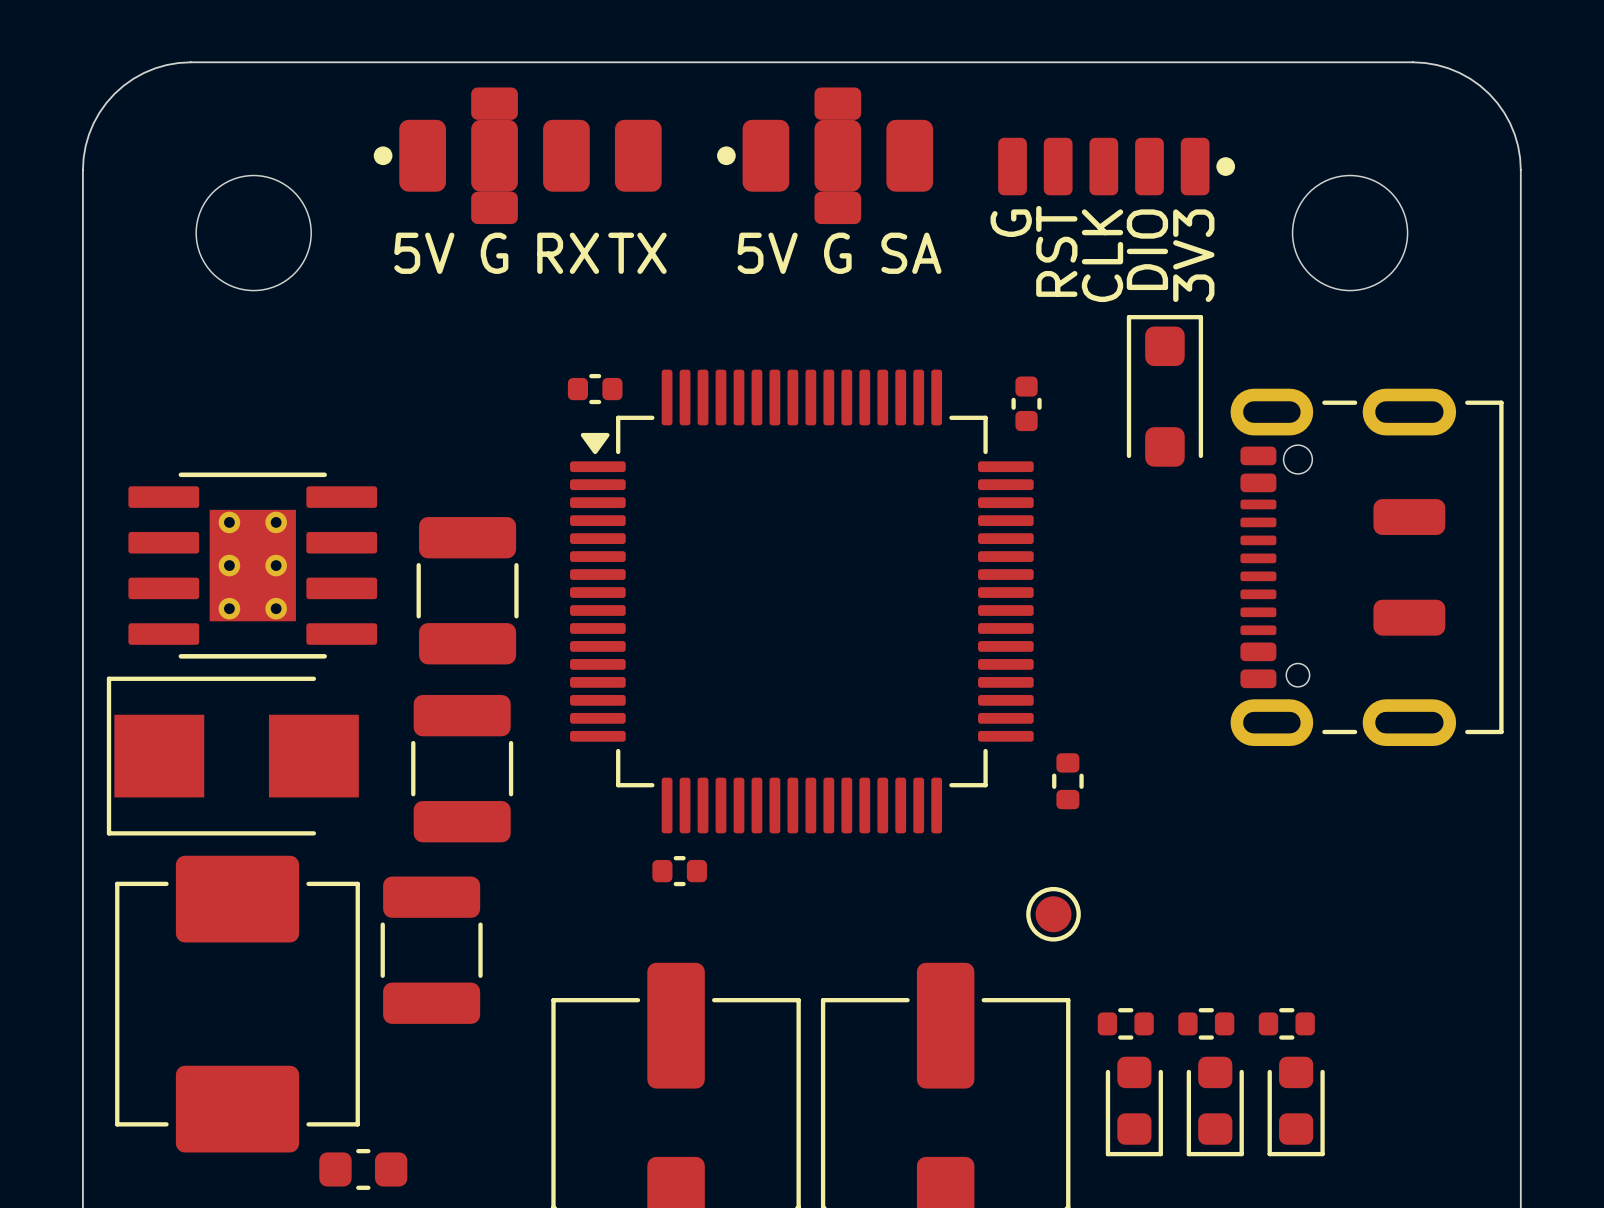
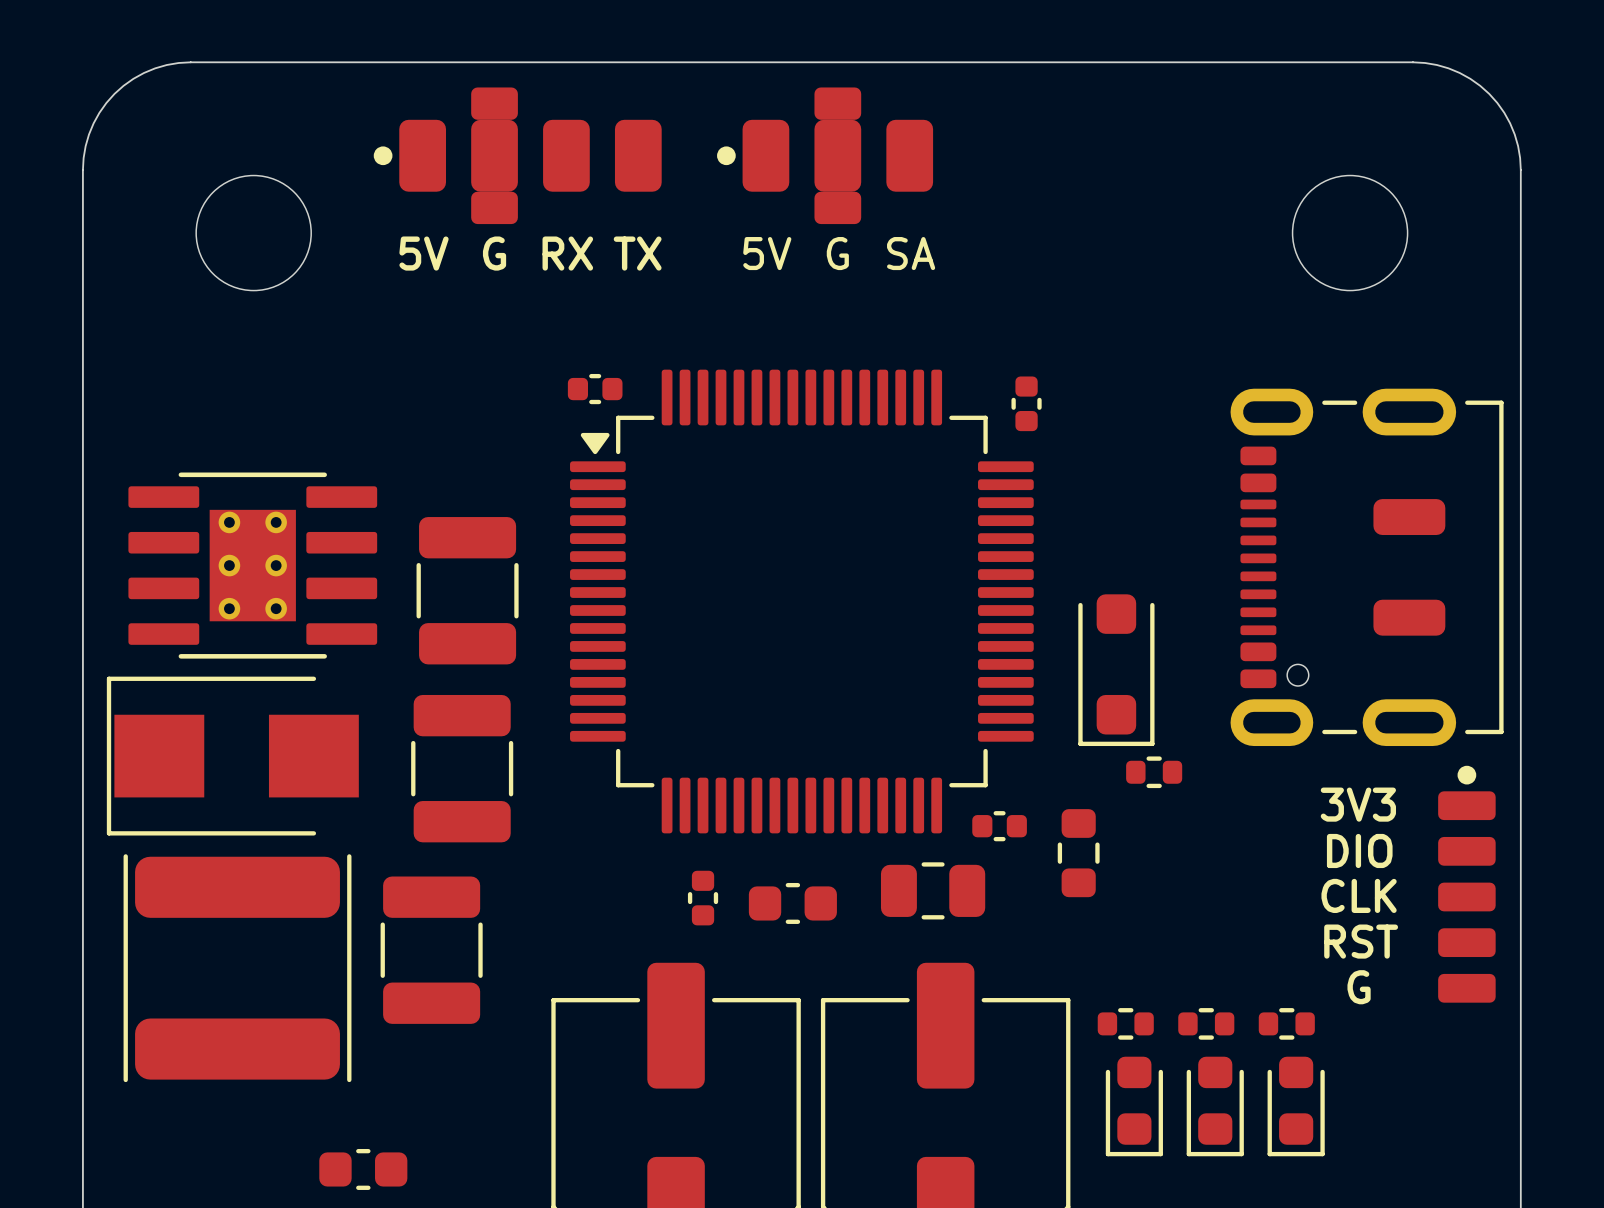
part footprint: [373, 87, 662, 225] -> [373, 87, 662, 225]
part footprint: [717, 87, 934, 225] -> [717, 87, 934, 225]
part: (1116, 166) -> none
part footprint: [1230, 388, 1504, 747] -> [1230, 388, 1504, 747]
part rotation: 0° (1164, 390) -> 180° (1116, 670)
part position: (1164, 390) -> (1116, 670)
part rotation: 0° (1067, 781) -> 90° clockwise (1154, 772)
part position: (1067, 781) -> (1154, 772)
part: none -> (999, 826)
part: none -> (1078, 853)
part footprint: [115, 855, 360, 1153] -> [123, 854, 352, 1083]
part rotation: 0° (679, 871) -> 90° clockwise (703, 898)
part position: (679, 871) -> (703, 898)
part: none -> (1466, 884)
part: none -> (933, 890)
part: none -> (792, 903)
part: (1053, 914) -> none

